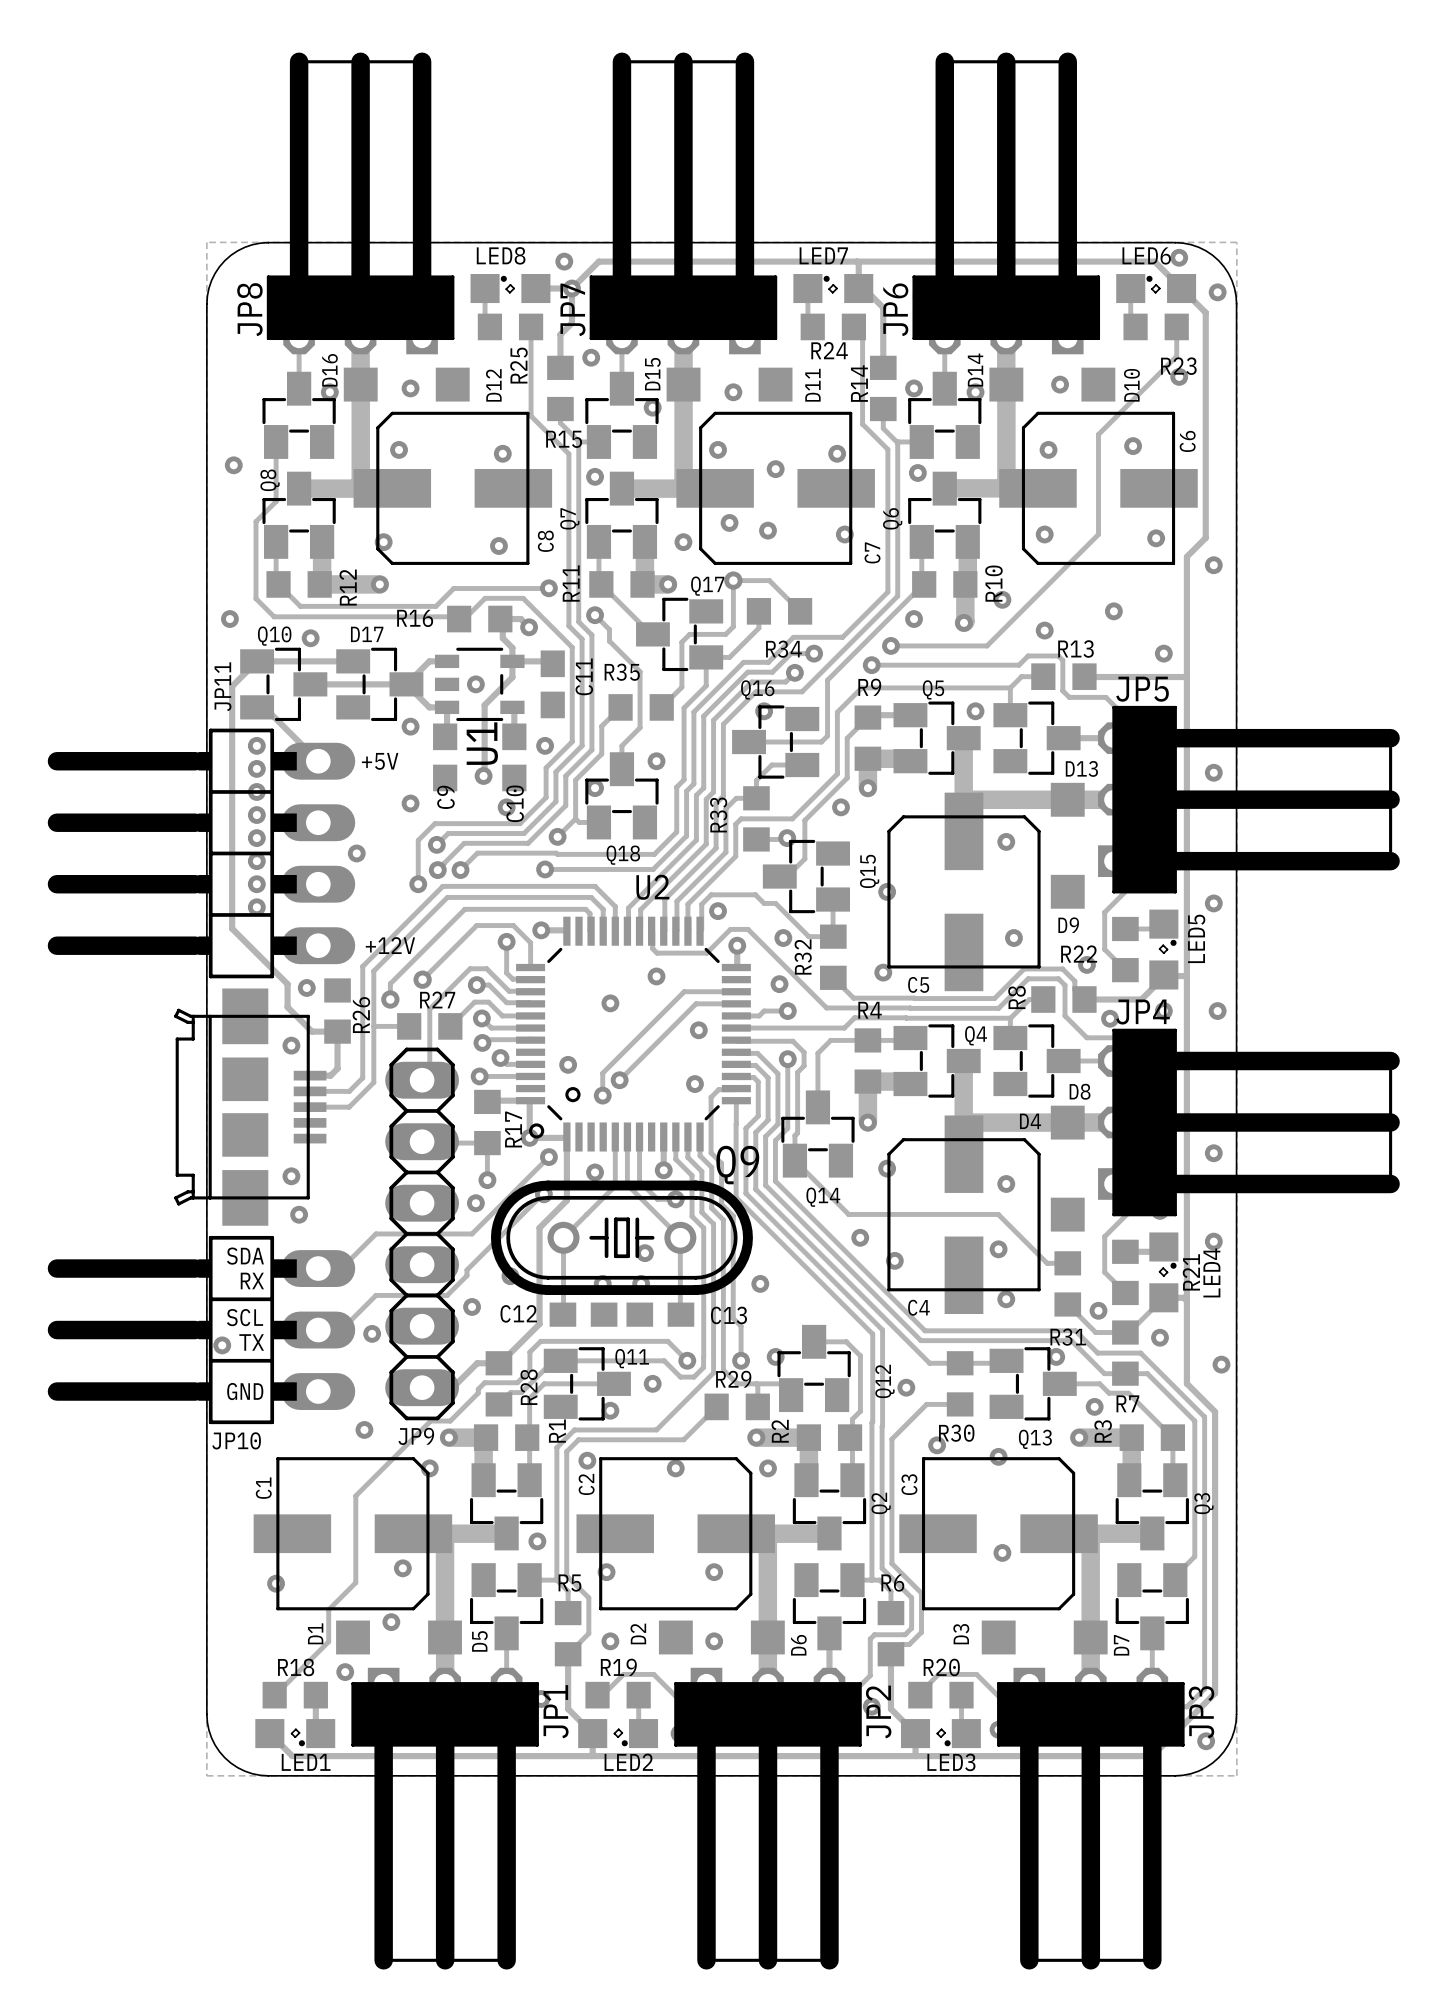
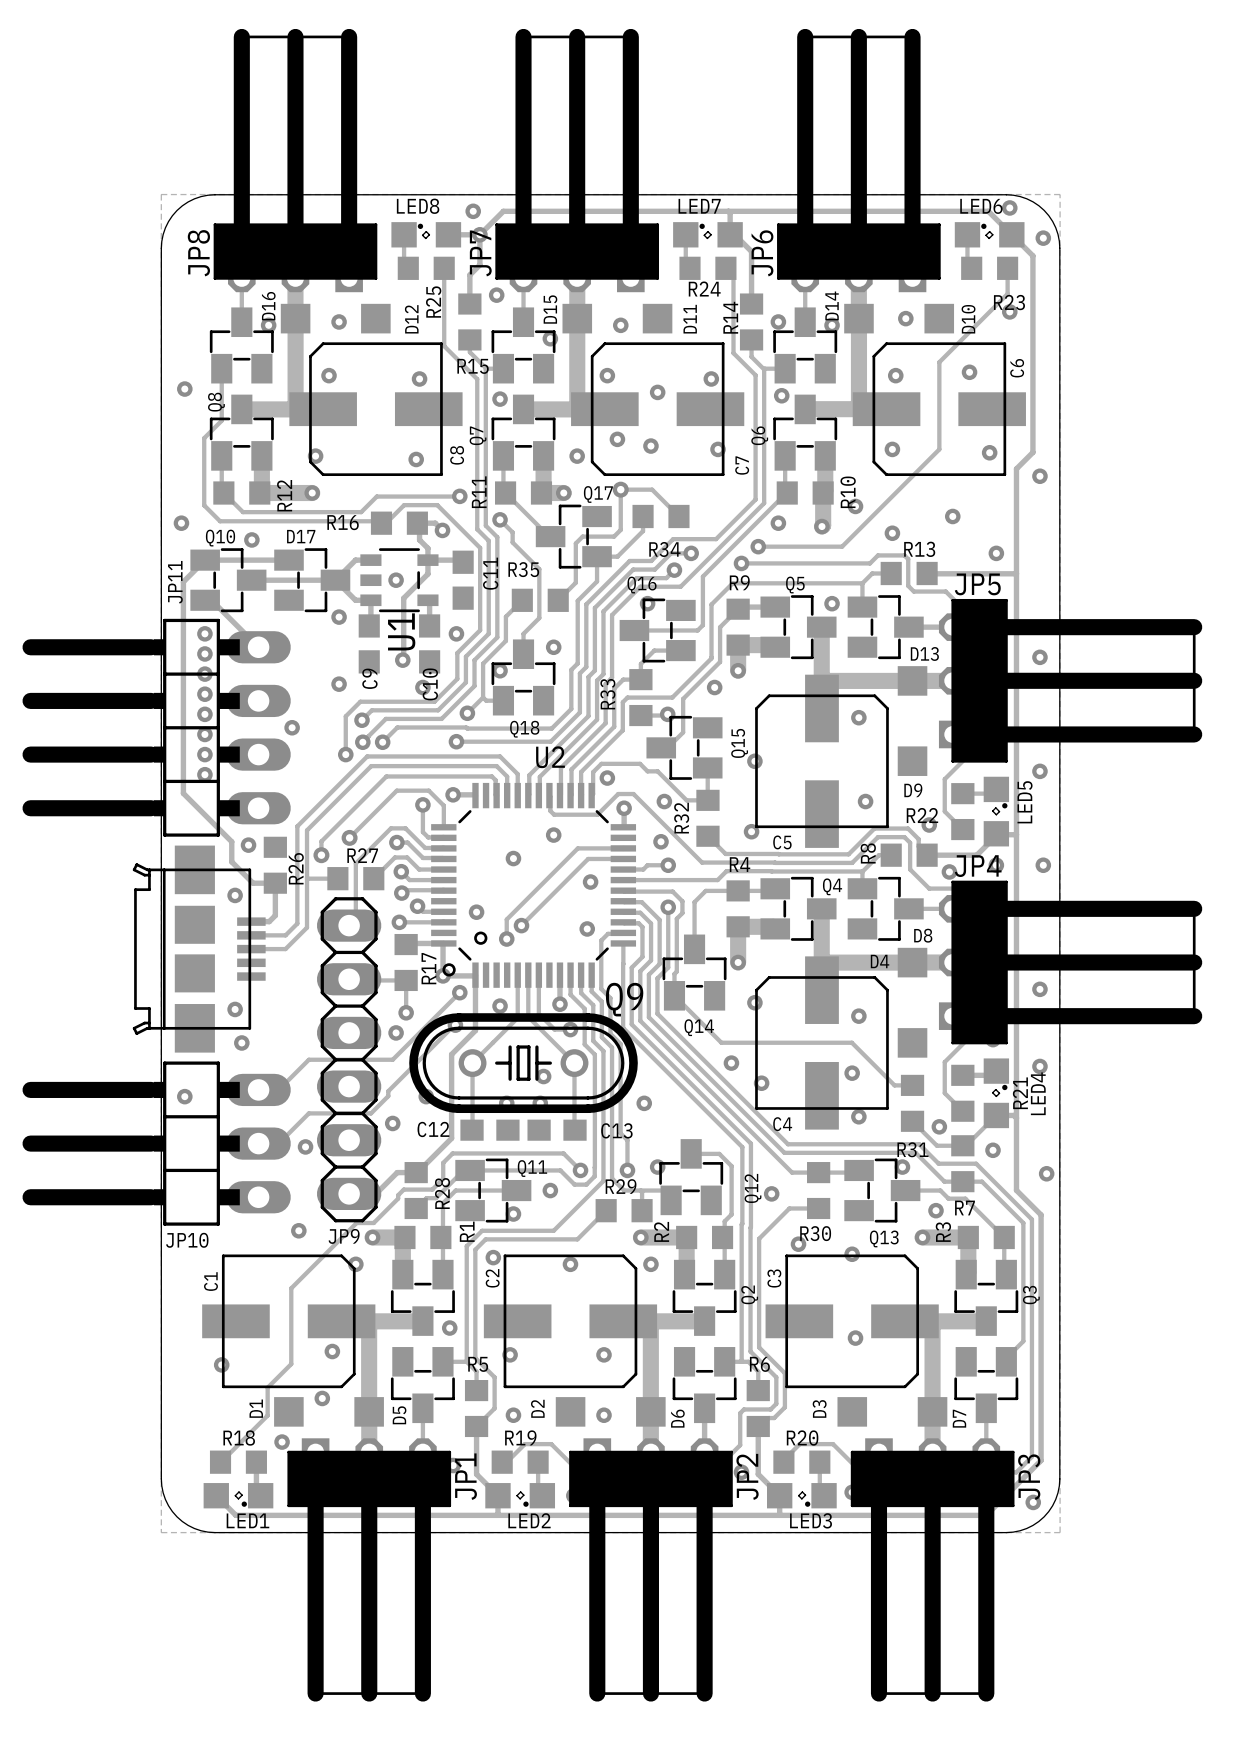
text: +5V (380, 761) -> none
text: +12V (390, 945) -> none
text: SDA (245, 1256) -> none
text: RX (252, 1280) -> none
text: SCL (245, 1317) -> none
text: TX (251, 1342) -> none
via position: (222, 1345) -> (184, 1096)
text: GND (245, 1391) -> none

